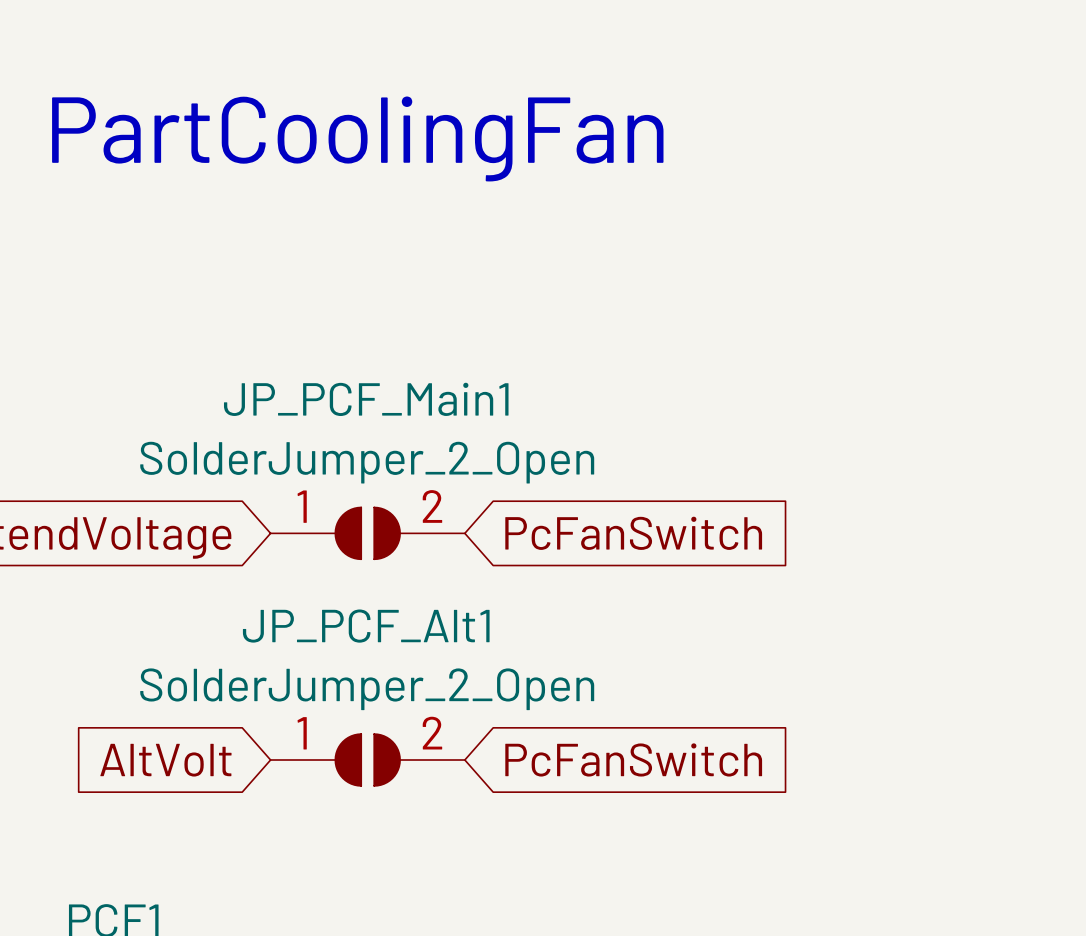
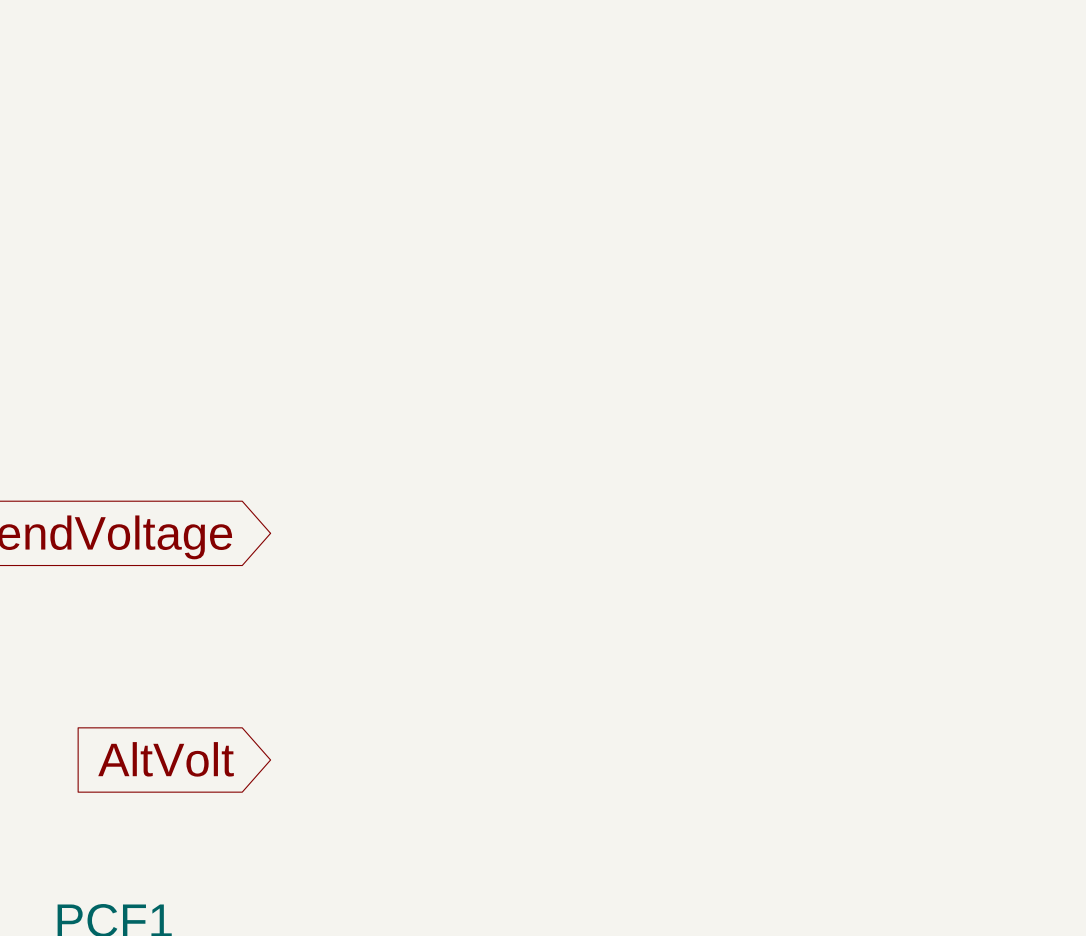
text: PartCoolingFan (357, 138) -> none
JP_PCF_Main1: SolderJumper_2_Open (367, 533) -> none
global label: PcFanSwitch (633, 533) -> none
global label: PcFanSwitch (633, 759) -> none
JP_PCF_Alt1: SolderJumper_2_Open (367, 760) -> none

